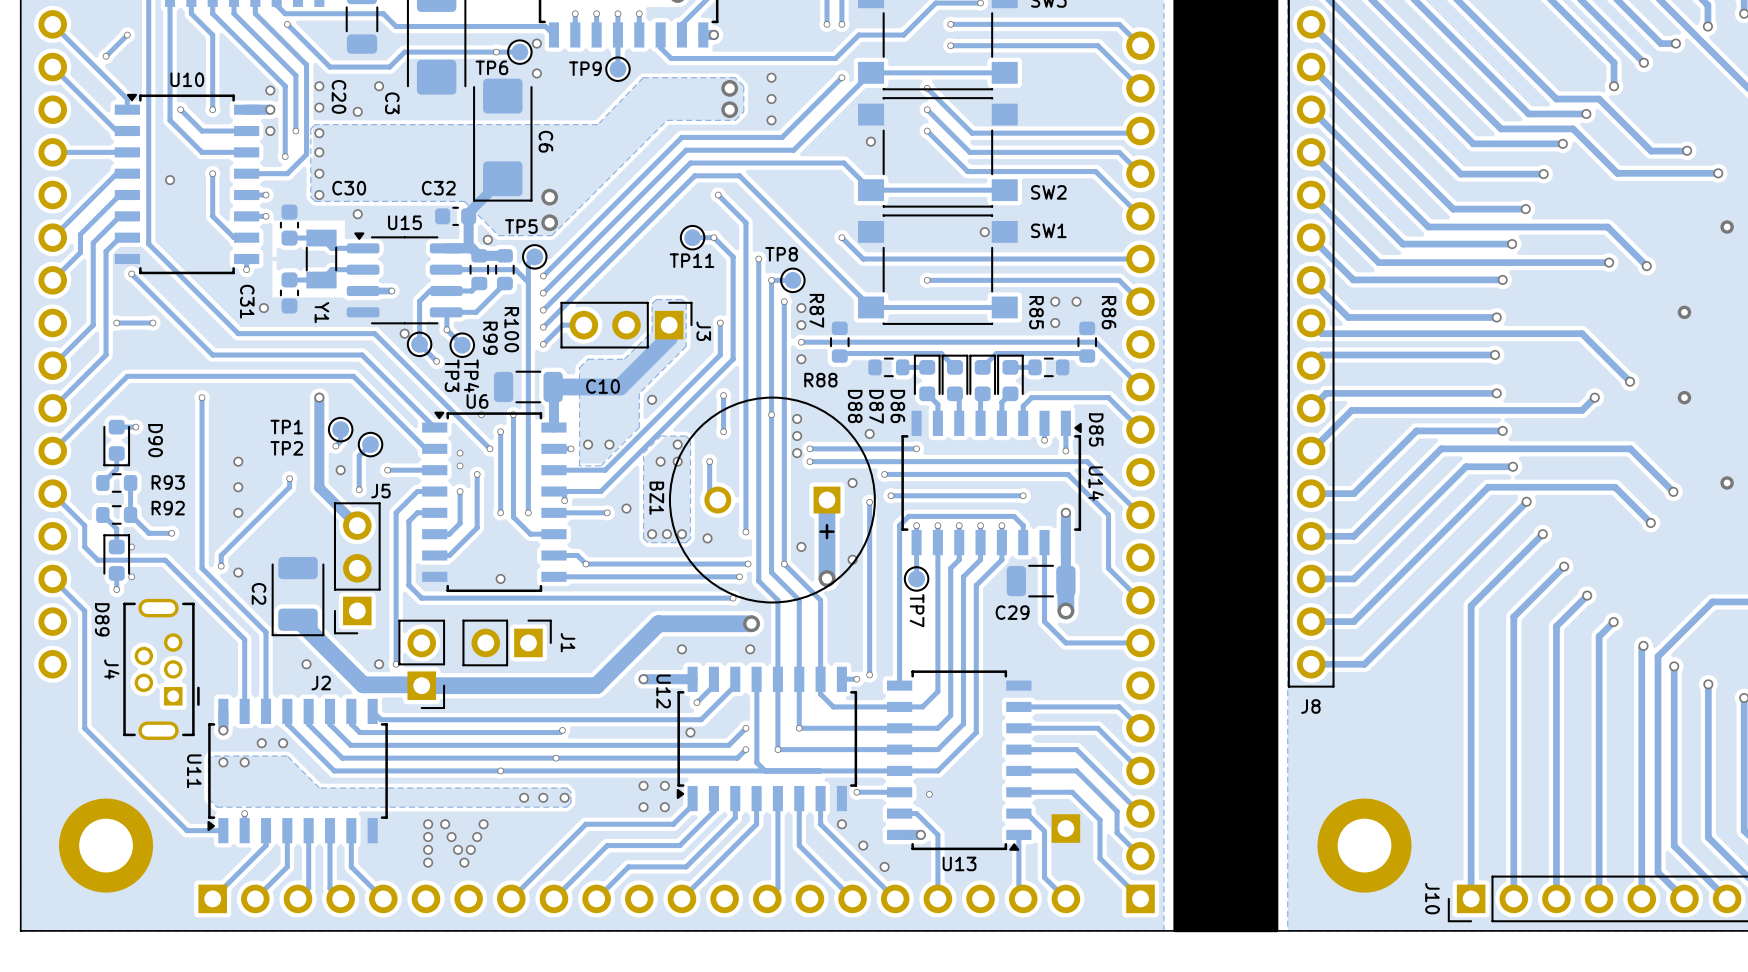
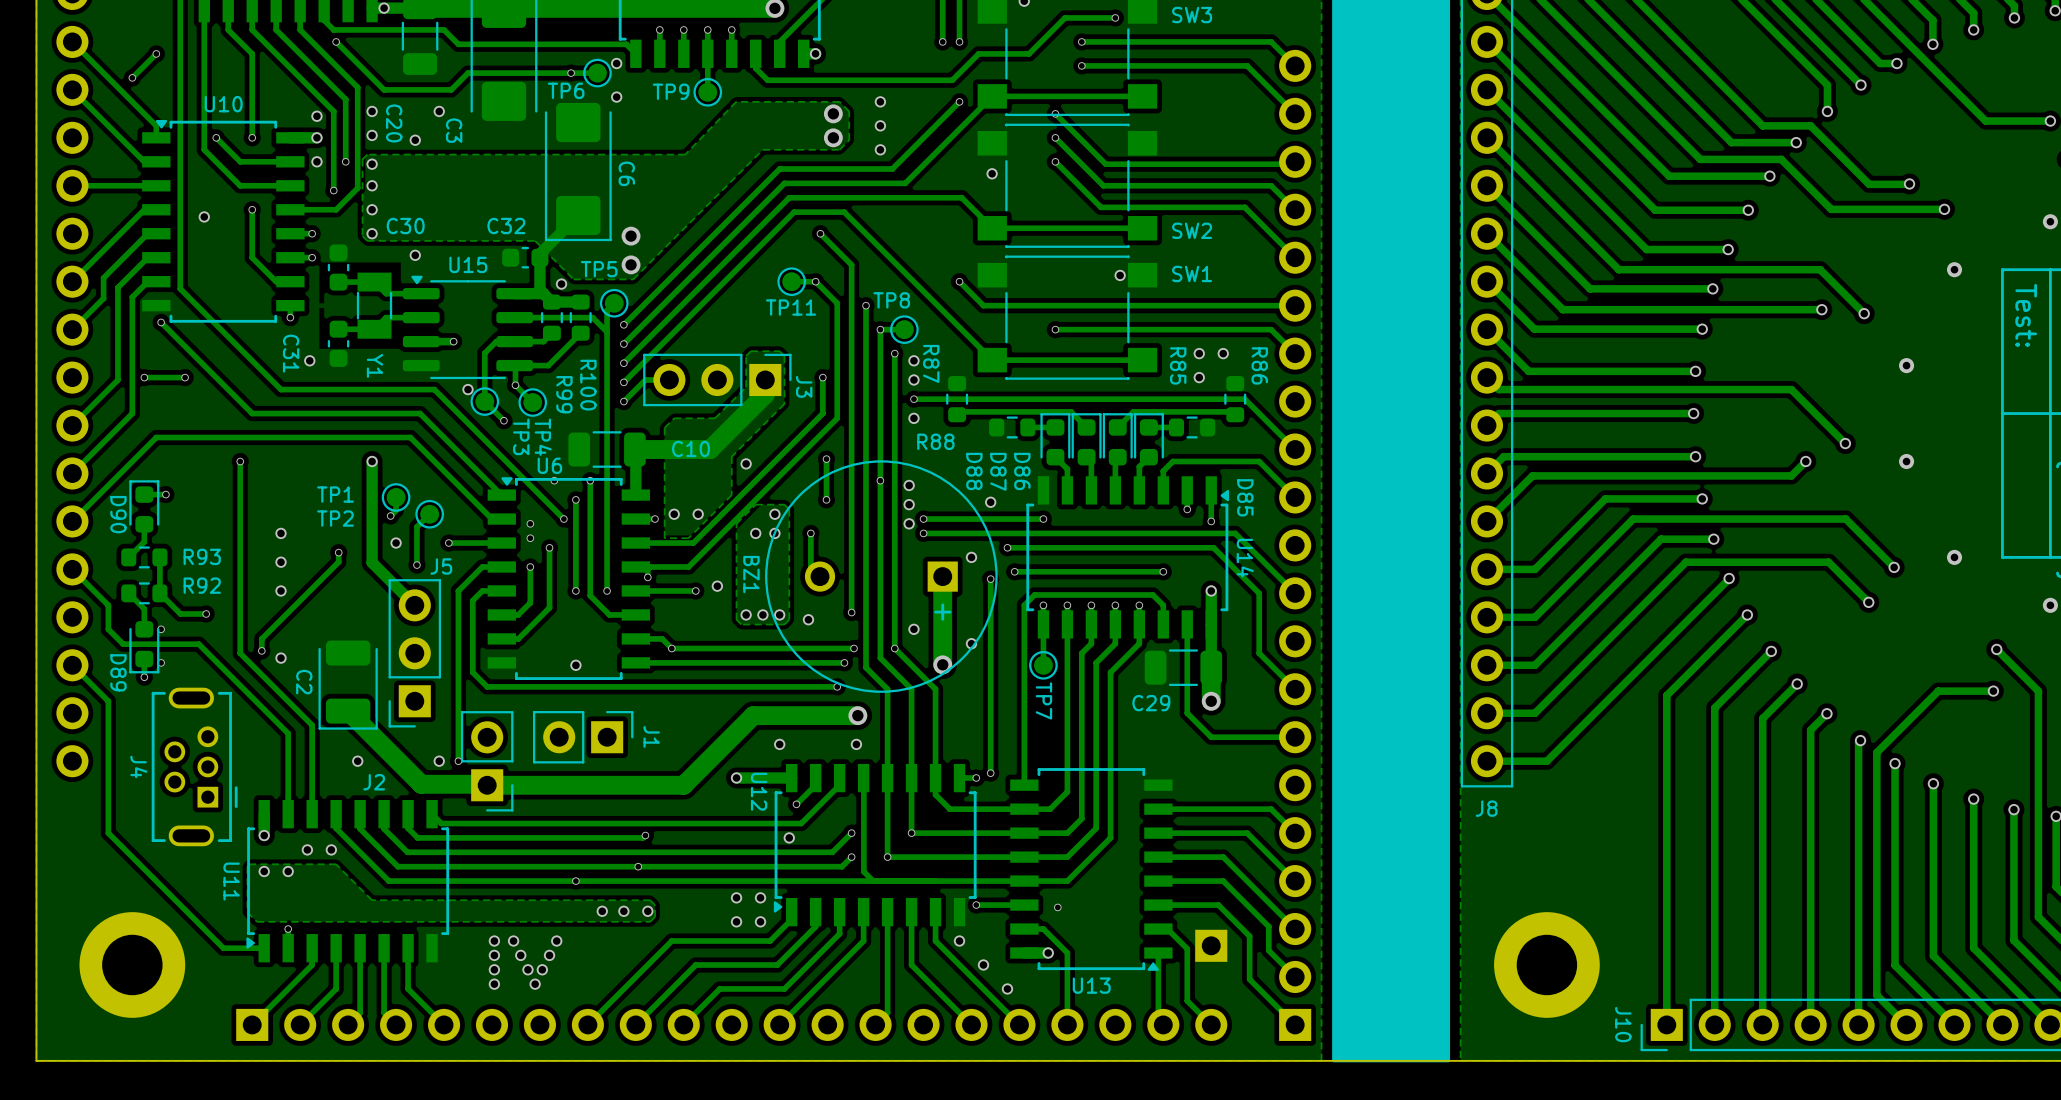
D90 rotation: 0° (116, 443) -> 180° (144, 506)
D89 rotation: 0° (116, 557) -> 180° (144, 647)
D89 name position: D89 (102, 619) -> D89 (118, 672)

